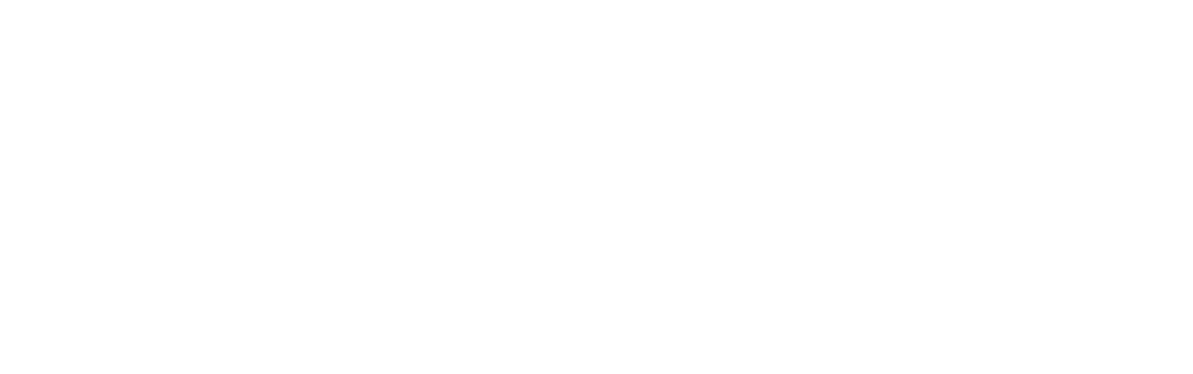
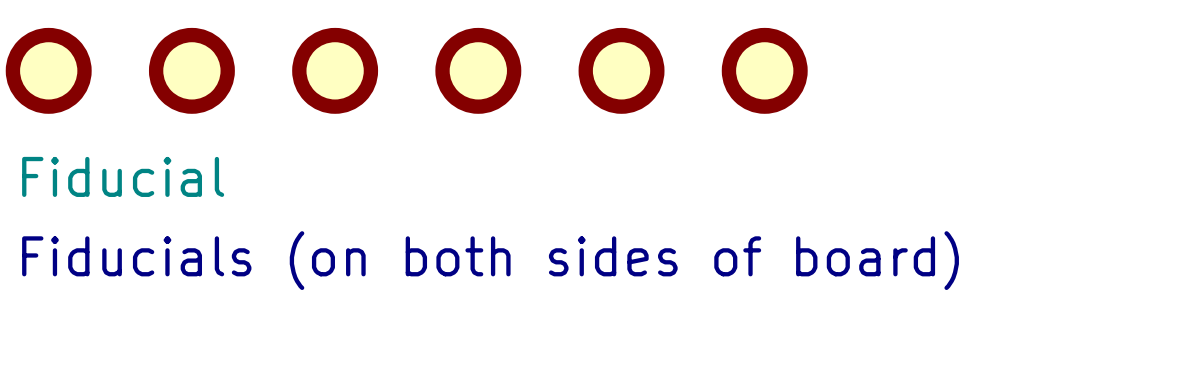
part: none -> Fiducial (48, 70)
part: none -> (191, 70)
part: none -> (335, 70)
part: none -> (478, 70)
part: none -> (621, 70)
part: none -> (764, 70)
text: none -> Fiducials (on both sides of board) (490, 260)

